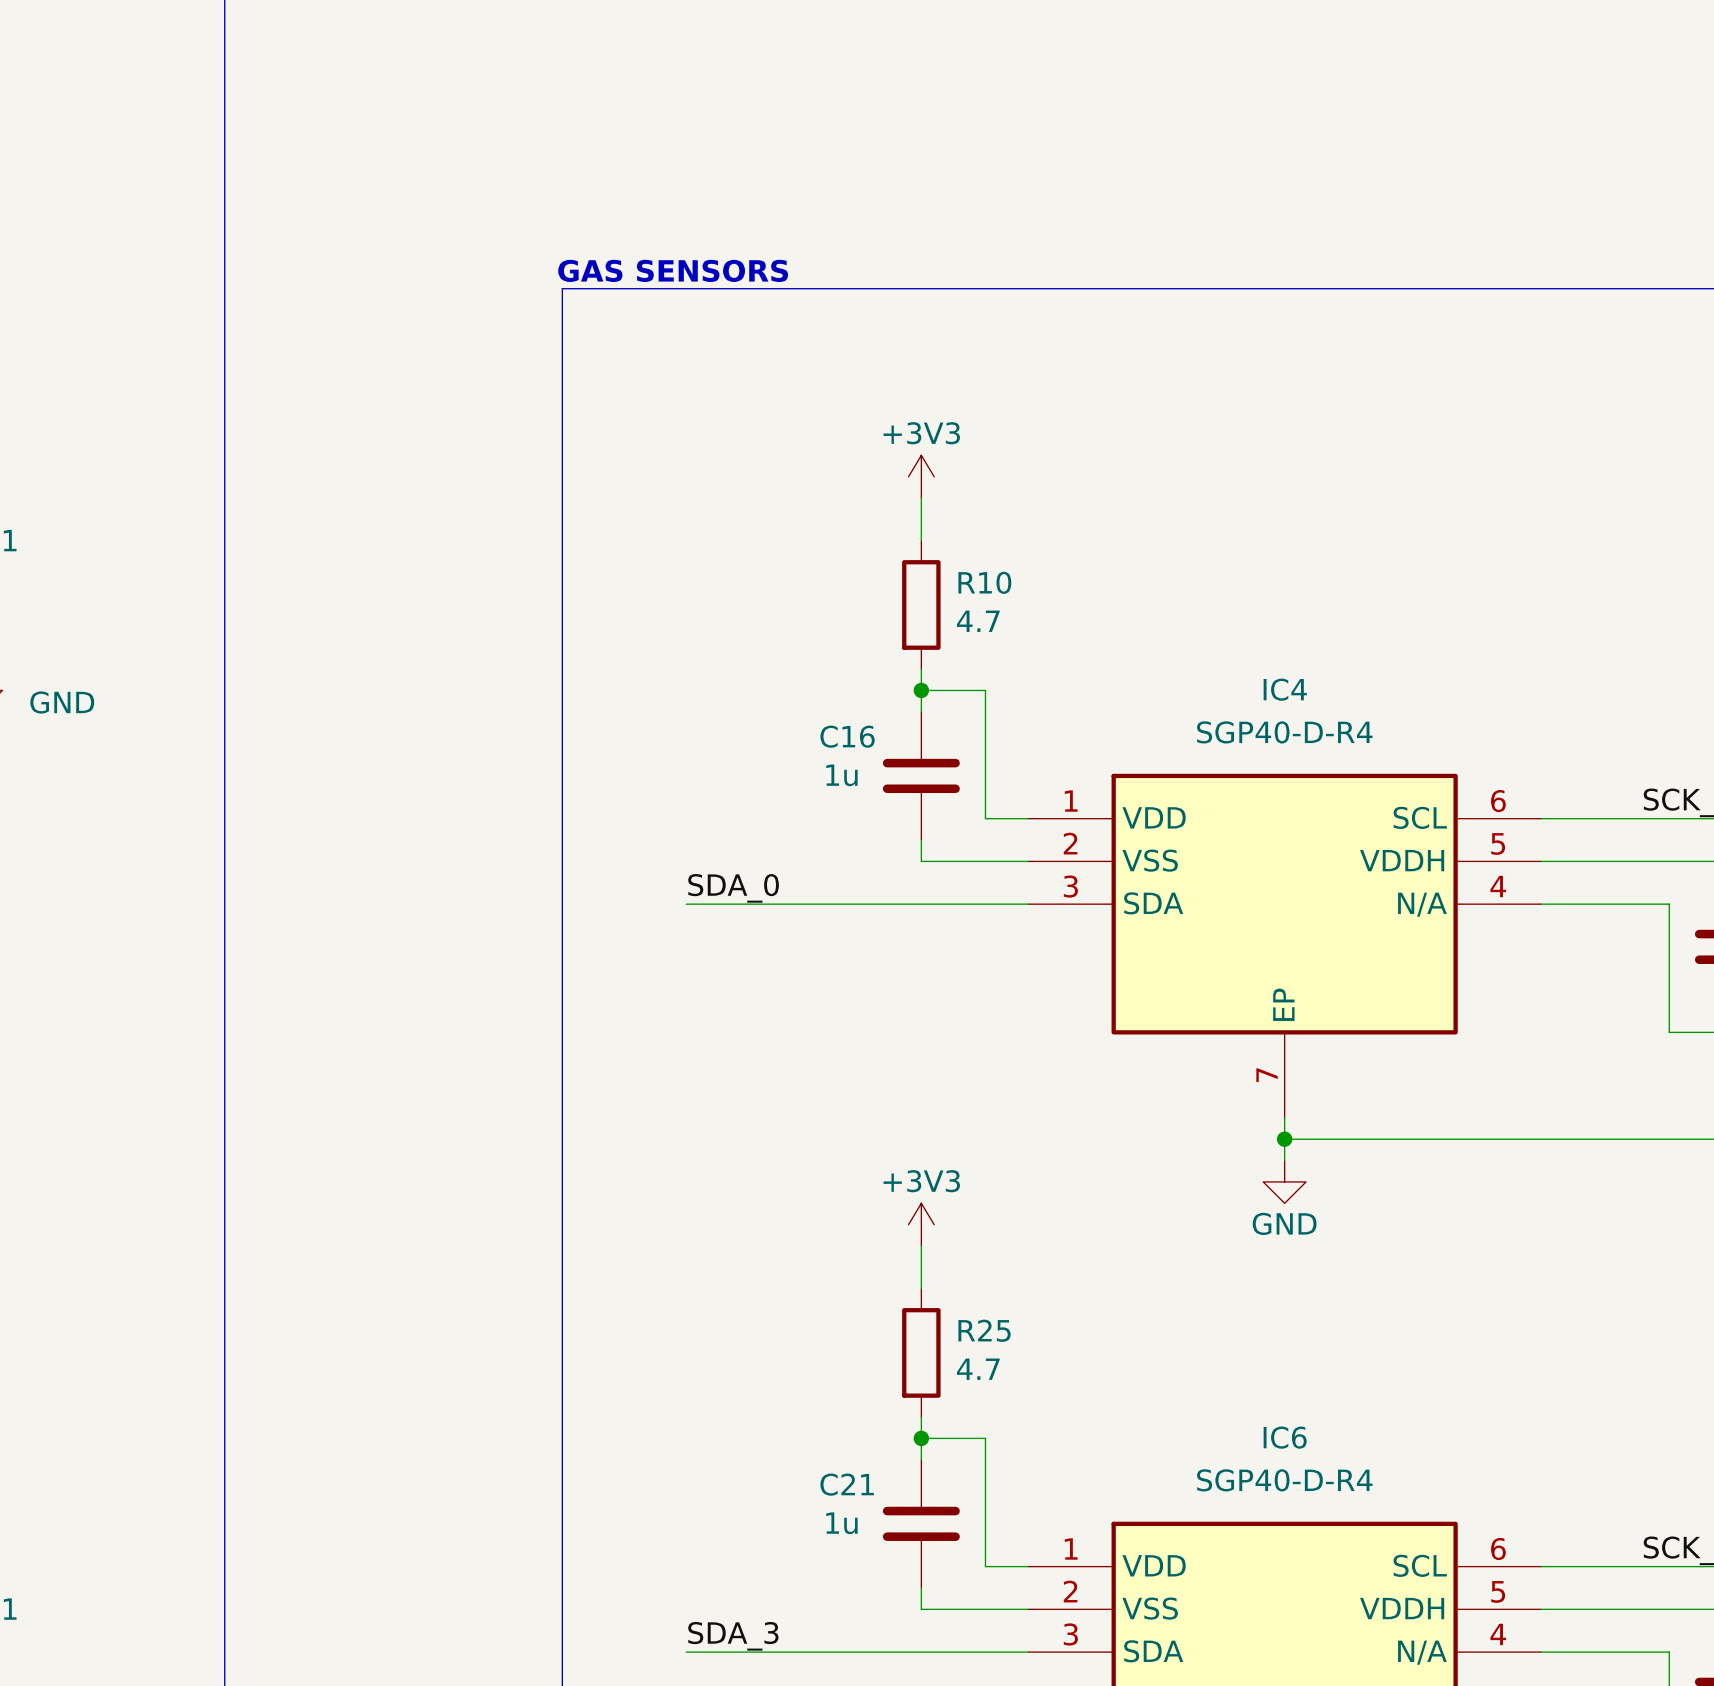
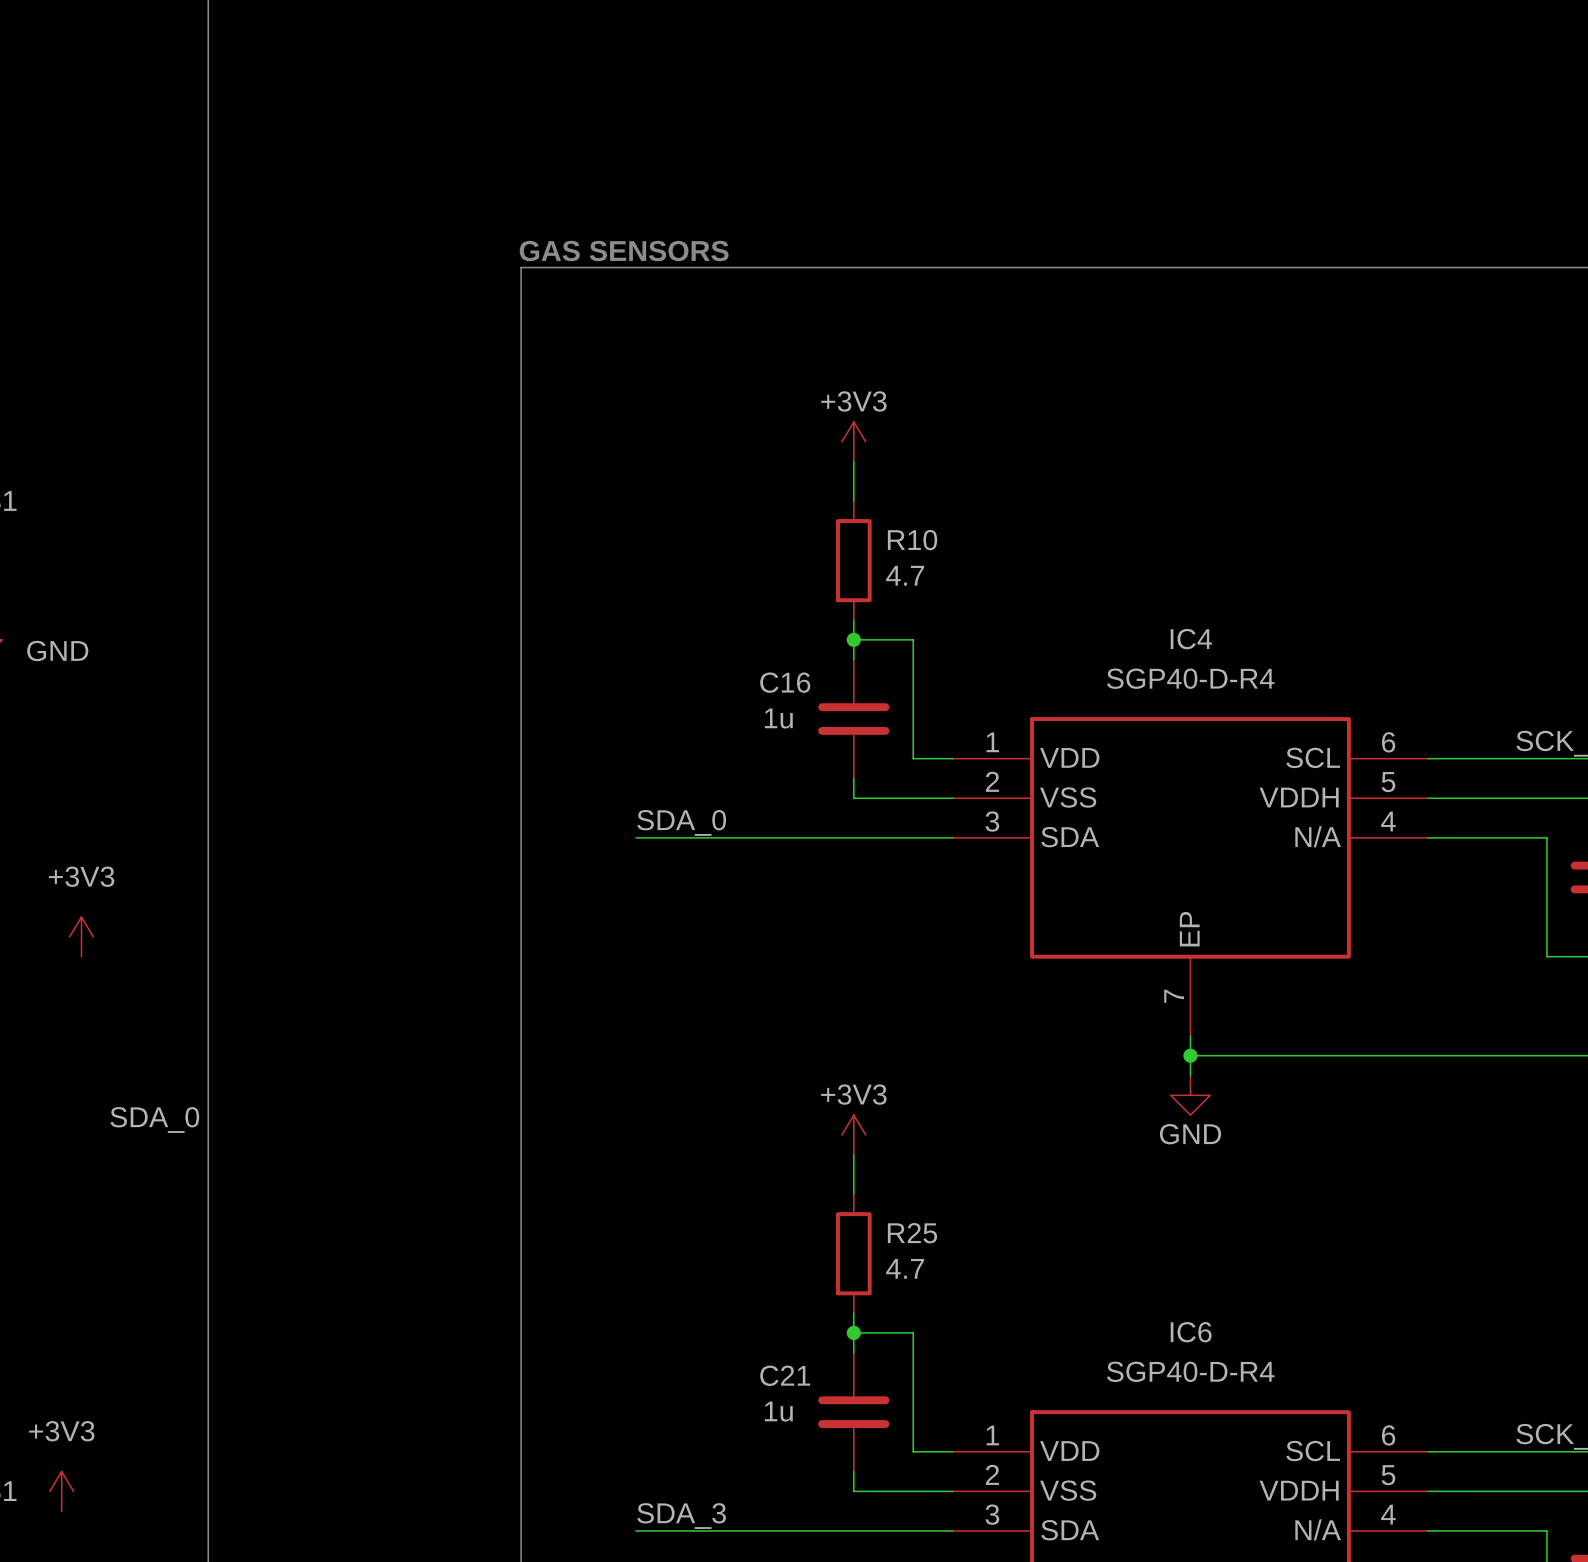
power symbol: none -> +3V3 (81, 936)
label: none -> SDA_0 (154, 1119)
power symbol: none -> +3V3 (61, 1491)

